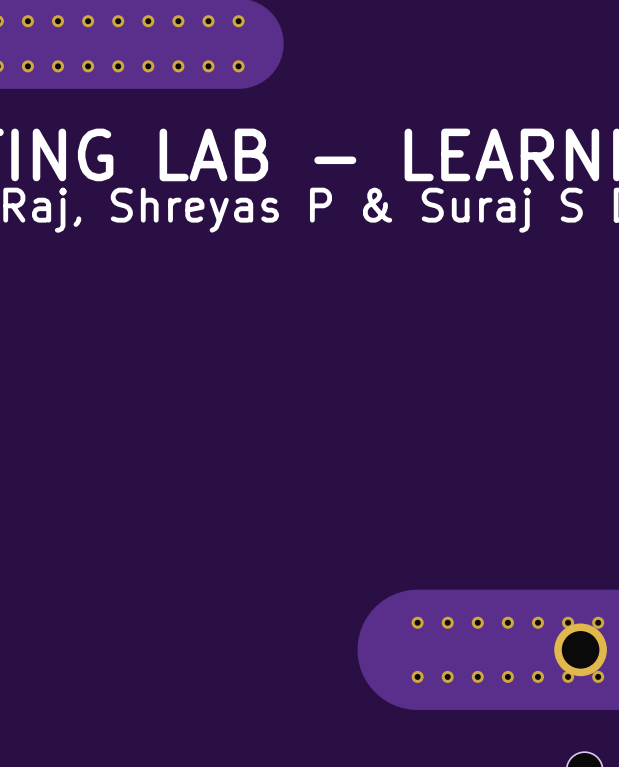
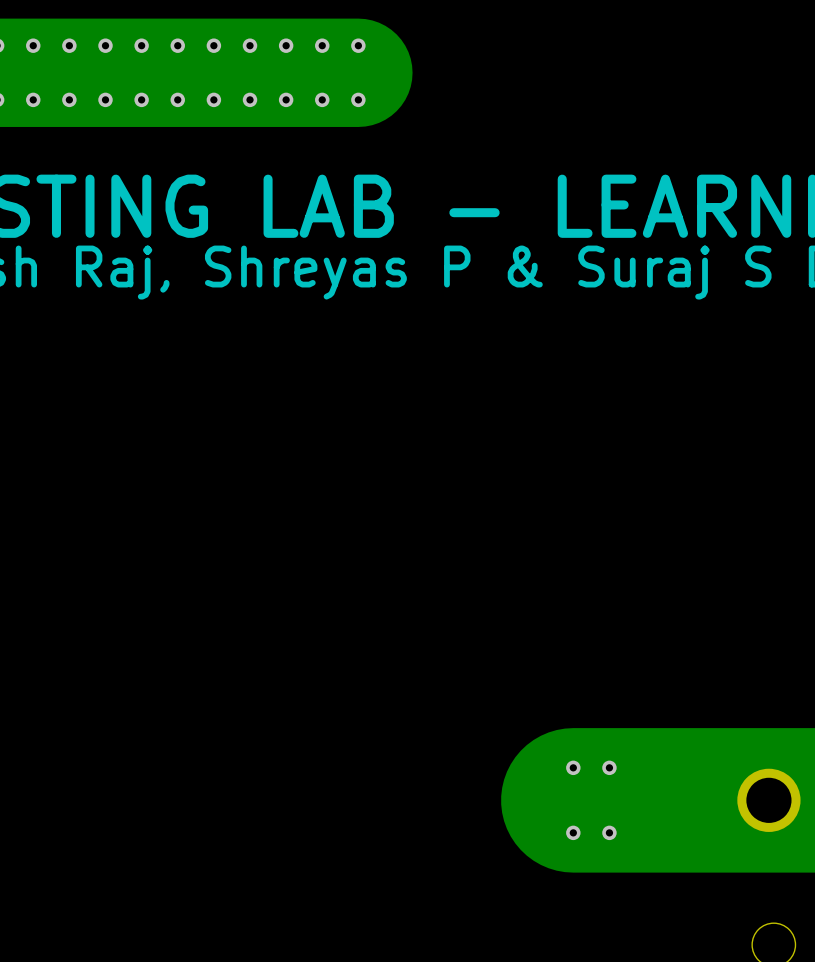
via: (477, 622) -> none
via: (507, 622) -> none
via: (538, 622) -> none
via: (568, 622) -> none
via: (598, 622) -> none
via: (477, 676) -> none
via: (507, 676) -> none
via: (538, 676) -> none
via: (568, 676) -> none
via: (598, 676) -> none

